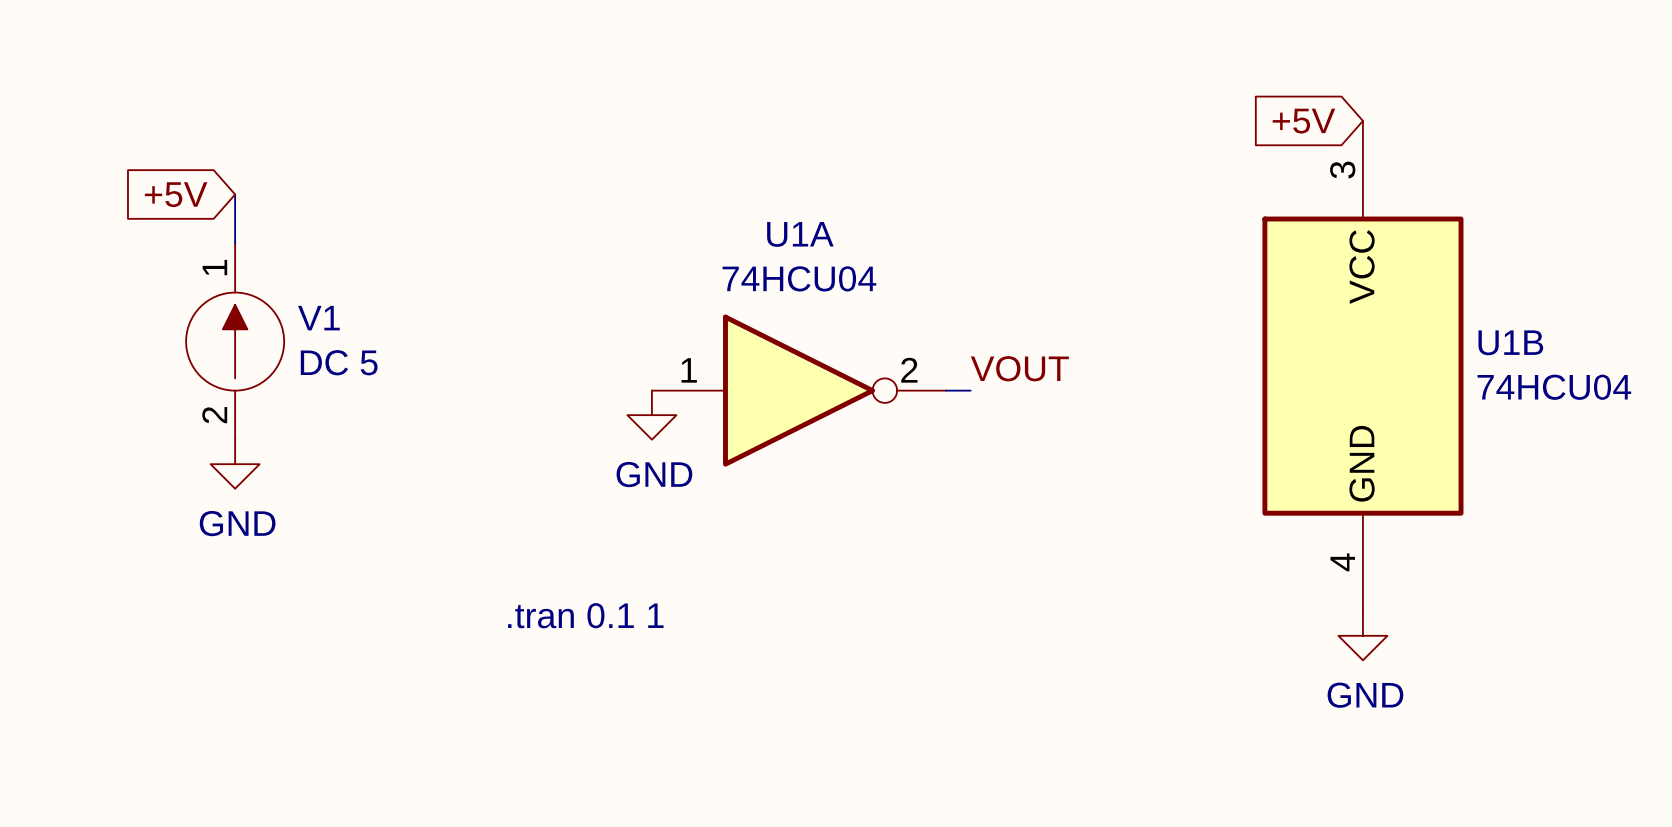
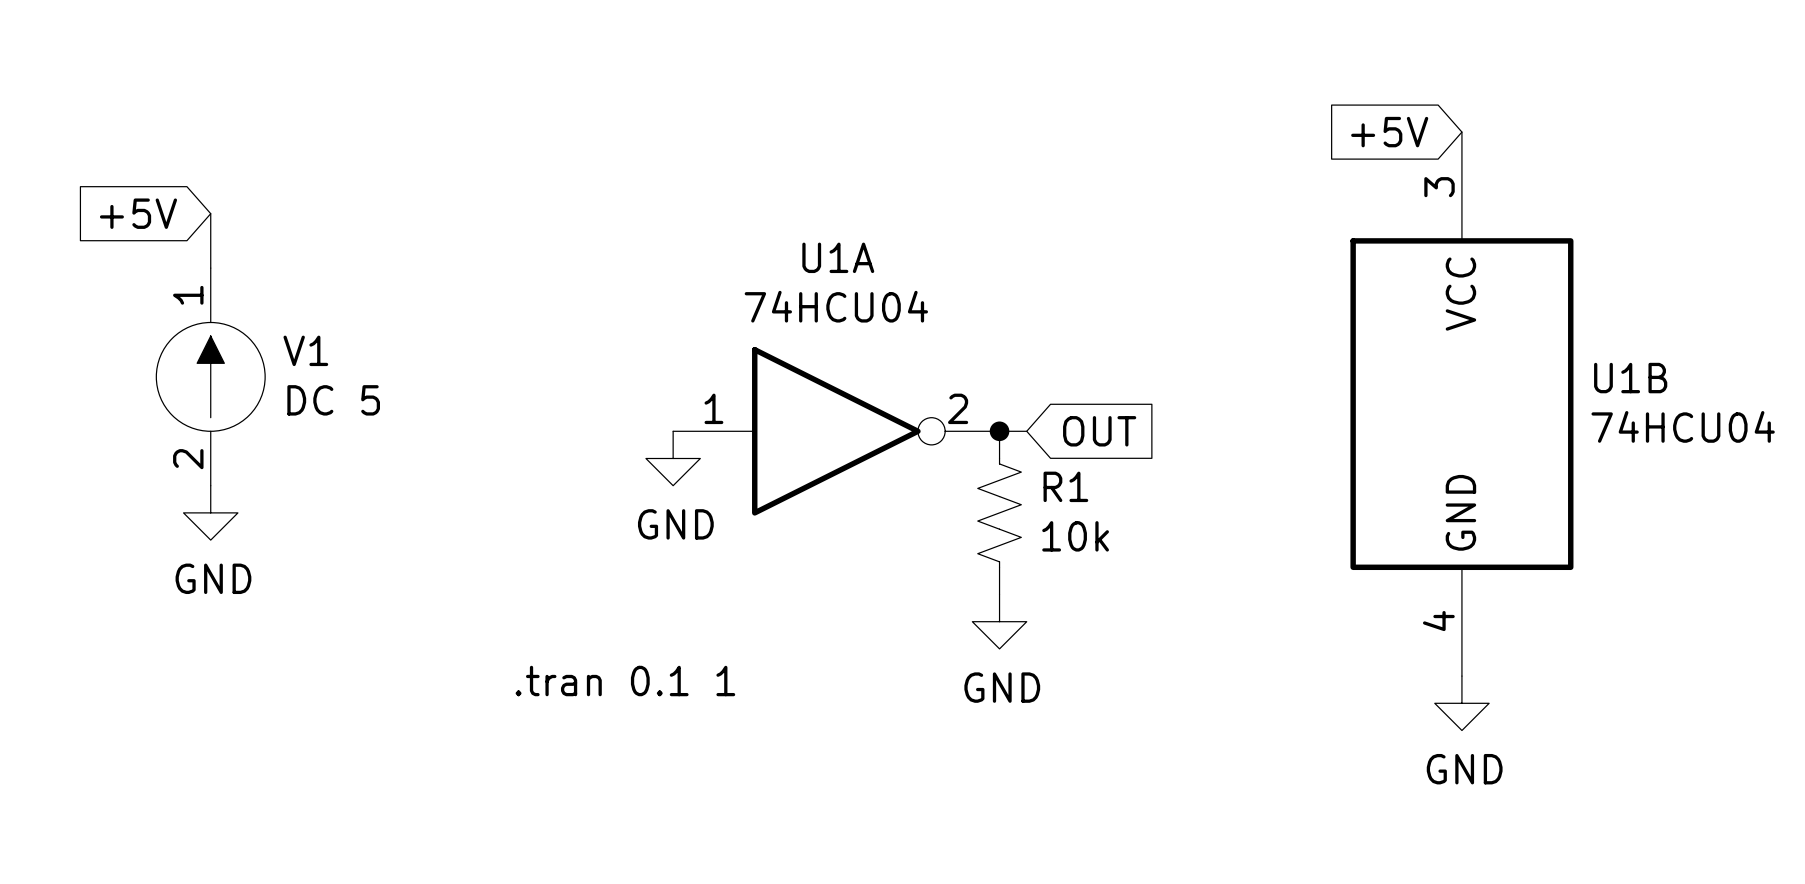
label: VOUT (1019, 368) -> none
junction: none -> (999, 431)
global label: none -> OUT (1099, 431)
R1: none -> 10k (999, 512)
power symbol: none -> GND (999, 621)

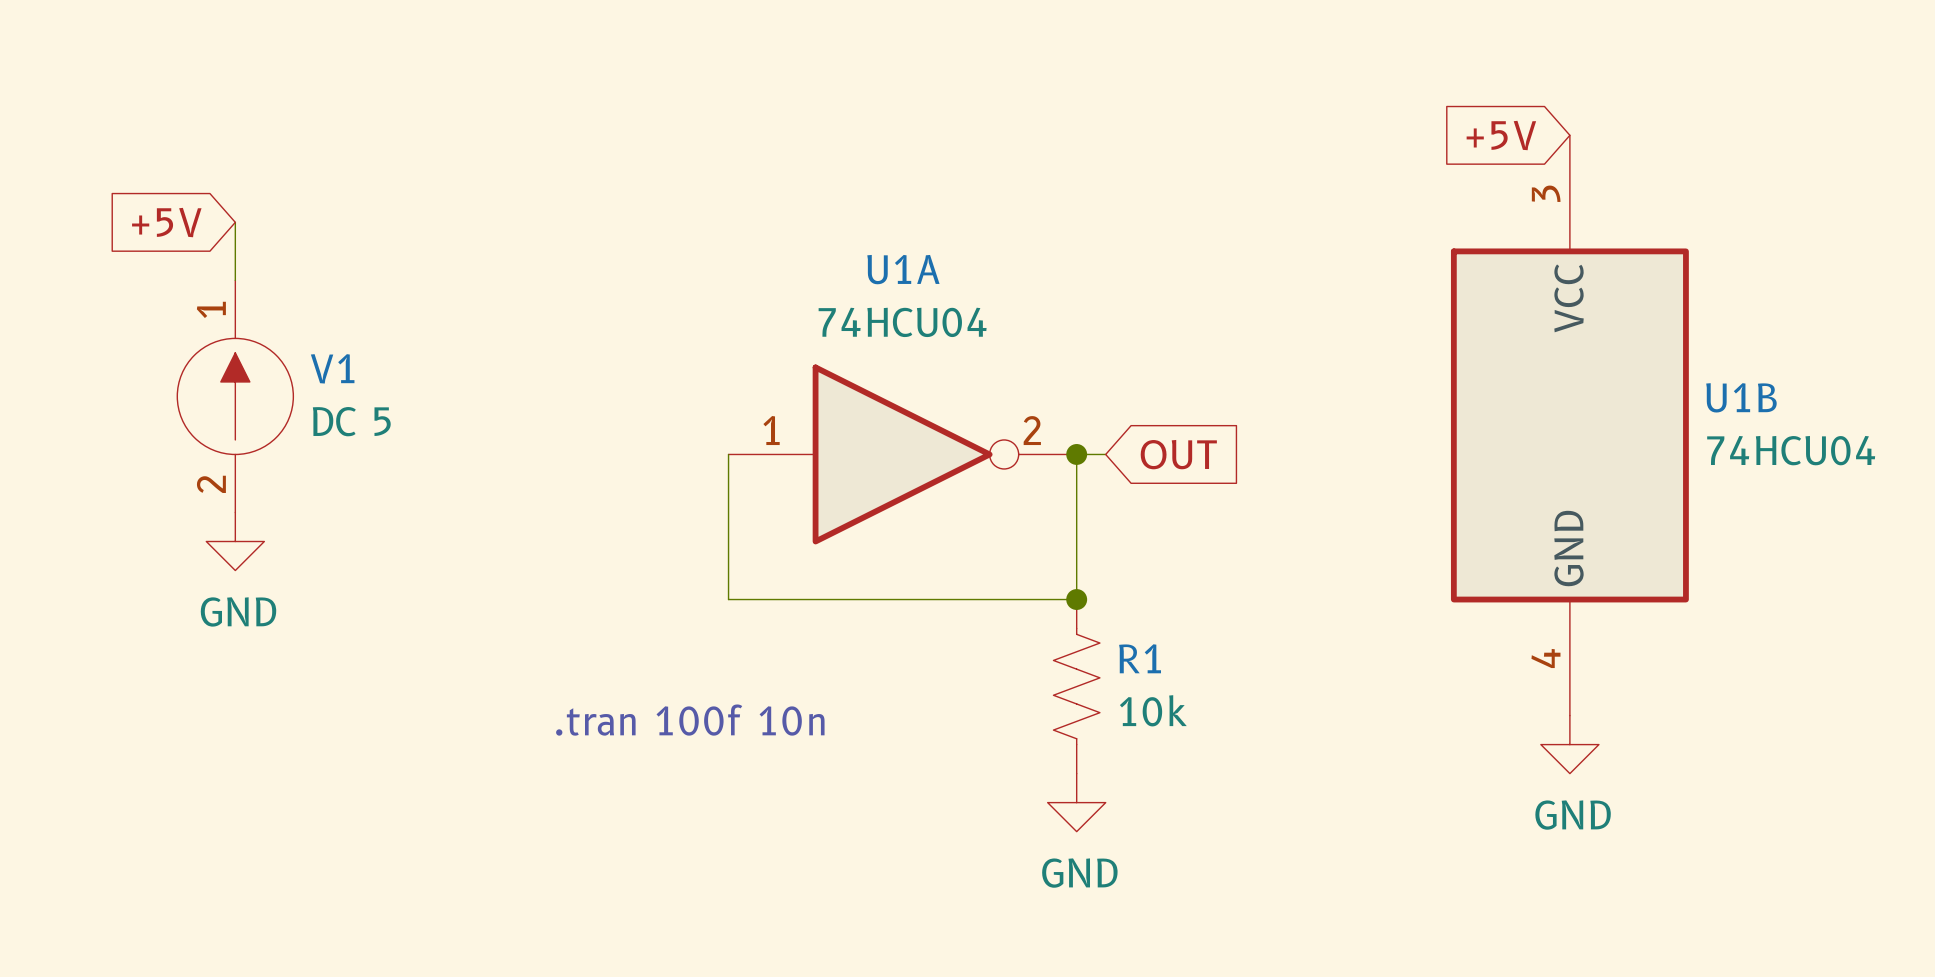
wire: none -> (728, 454) (728, 599) (1076, 599) (1076, 454)
power symbol: GND (673, 458) -> none
R1 position: (999, 512) -> (1076, 686)
junction: none -> (1076, 599)
power symbol position: GND (999, 621) -> GND (1076, 802)
text: .tran 0.1 1 (625, 681) -> .tran 100f 10n (690, 720)

